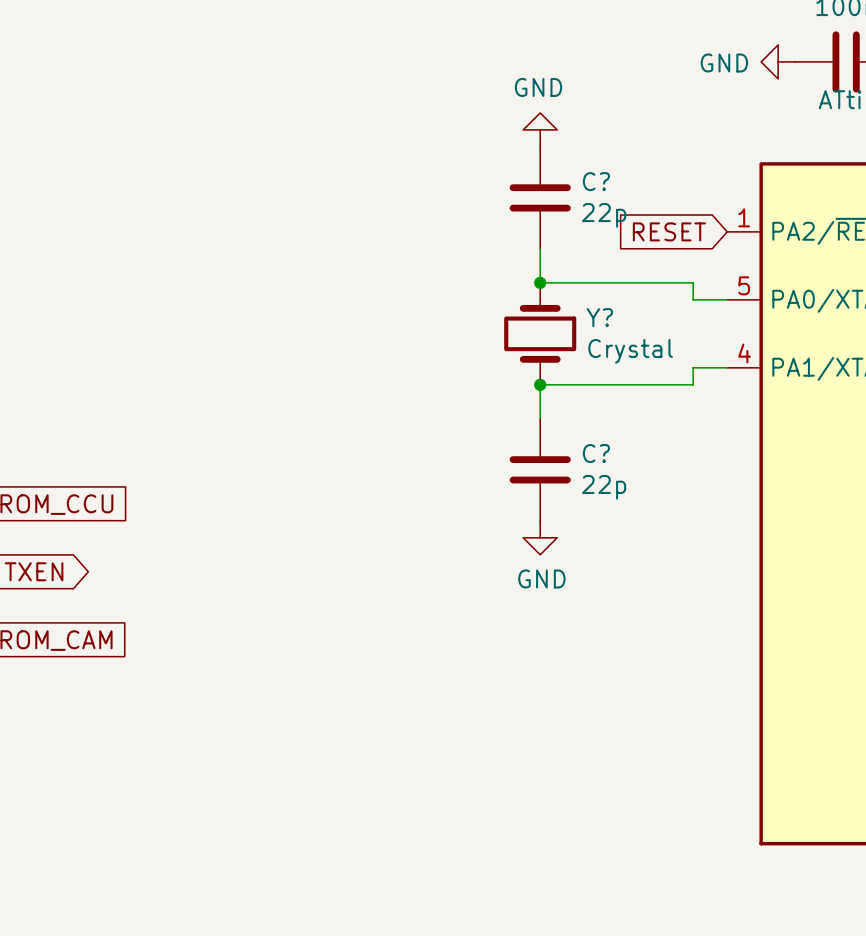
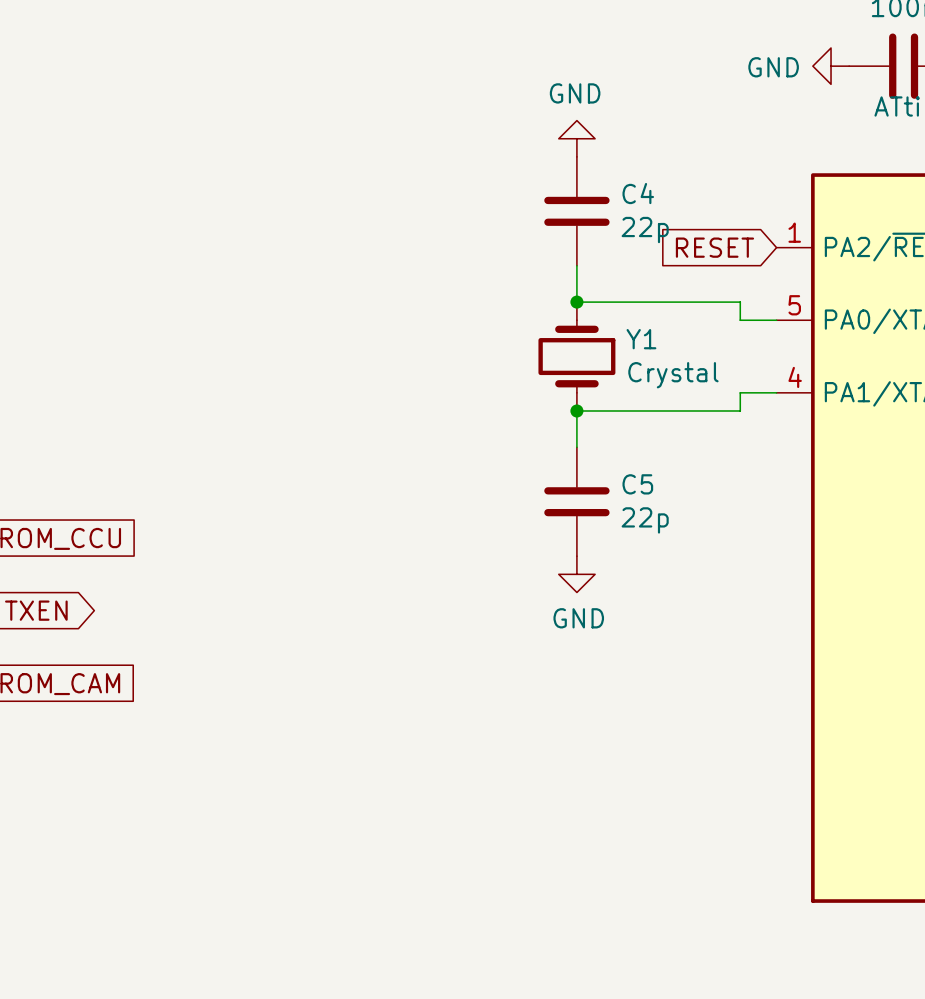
C? name: C? (596, 181) -> C4 (638, 193)
Y? name: Y? (599, 317) -> Y1 (641, 339)
C? name: C? (596, 453) -> C5 (637, 484)

